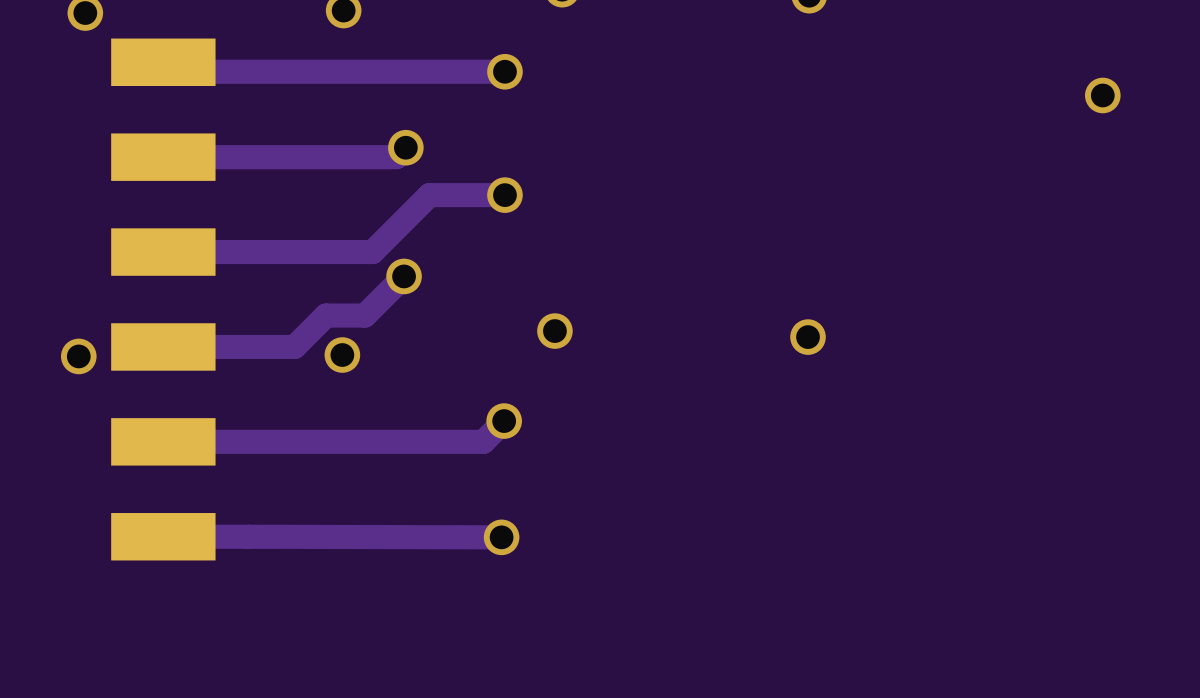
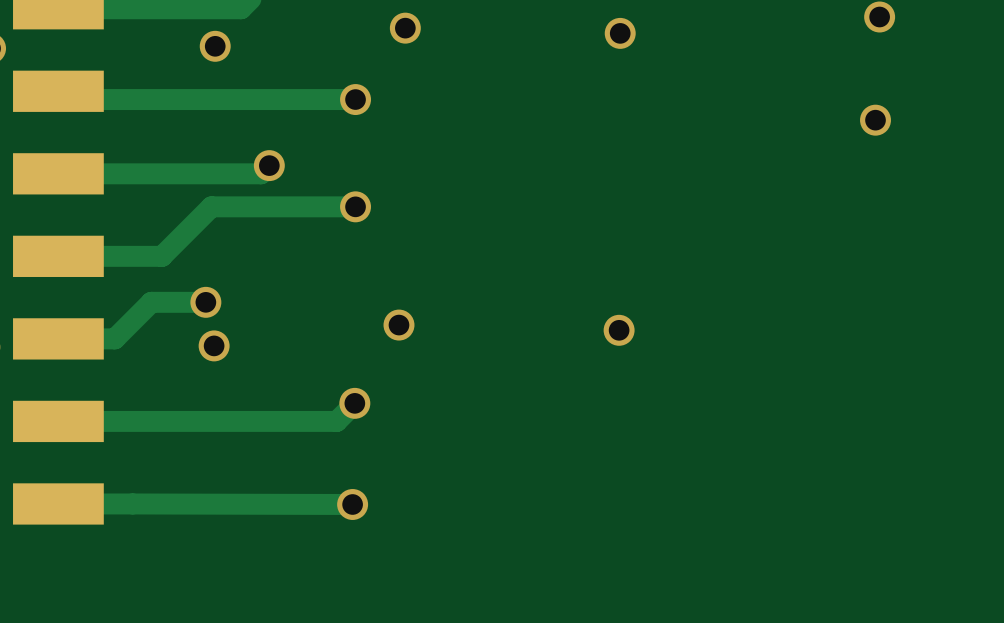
track: (429, 195) (372, 252) (282, 252) -> (289, 206) (211, 206) (162, 256)
track: (404, 276) (364, 315) (326, 315) (294, 346) (228, 346) -> (205, 302) (151, 302) (114, 338)
via position: (404, 276) -> (205, 302)

